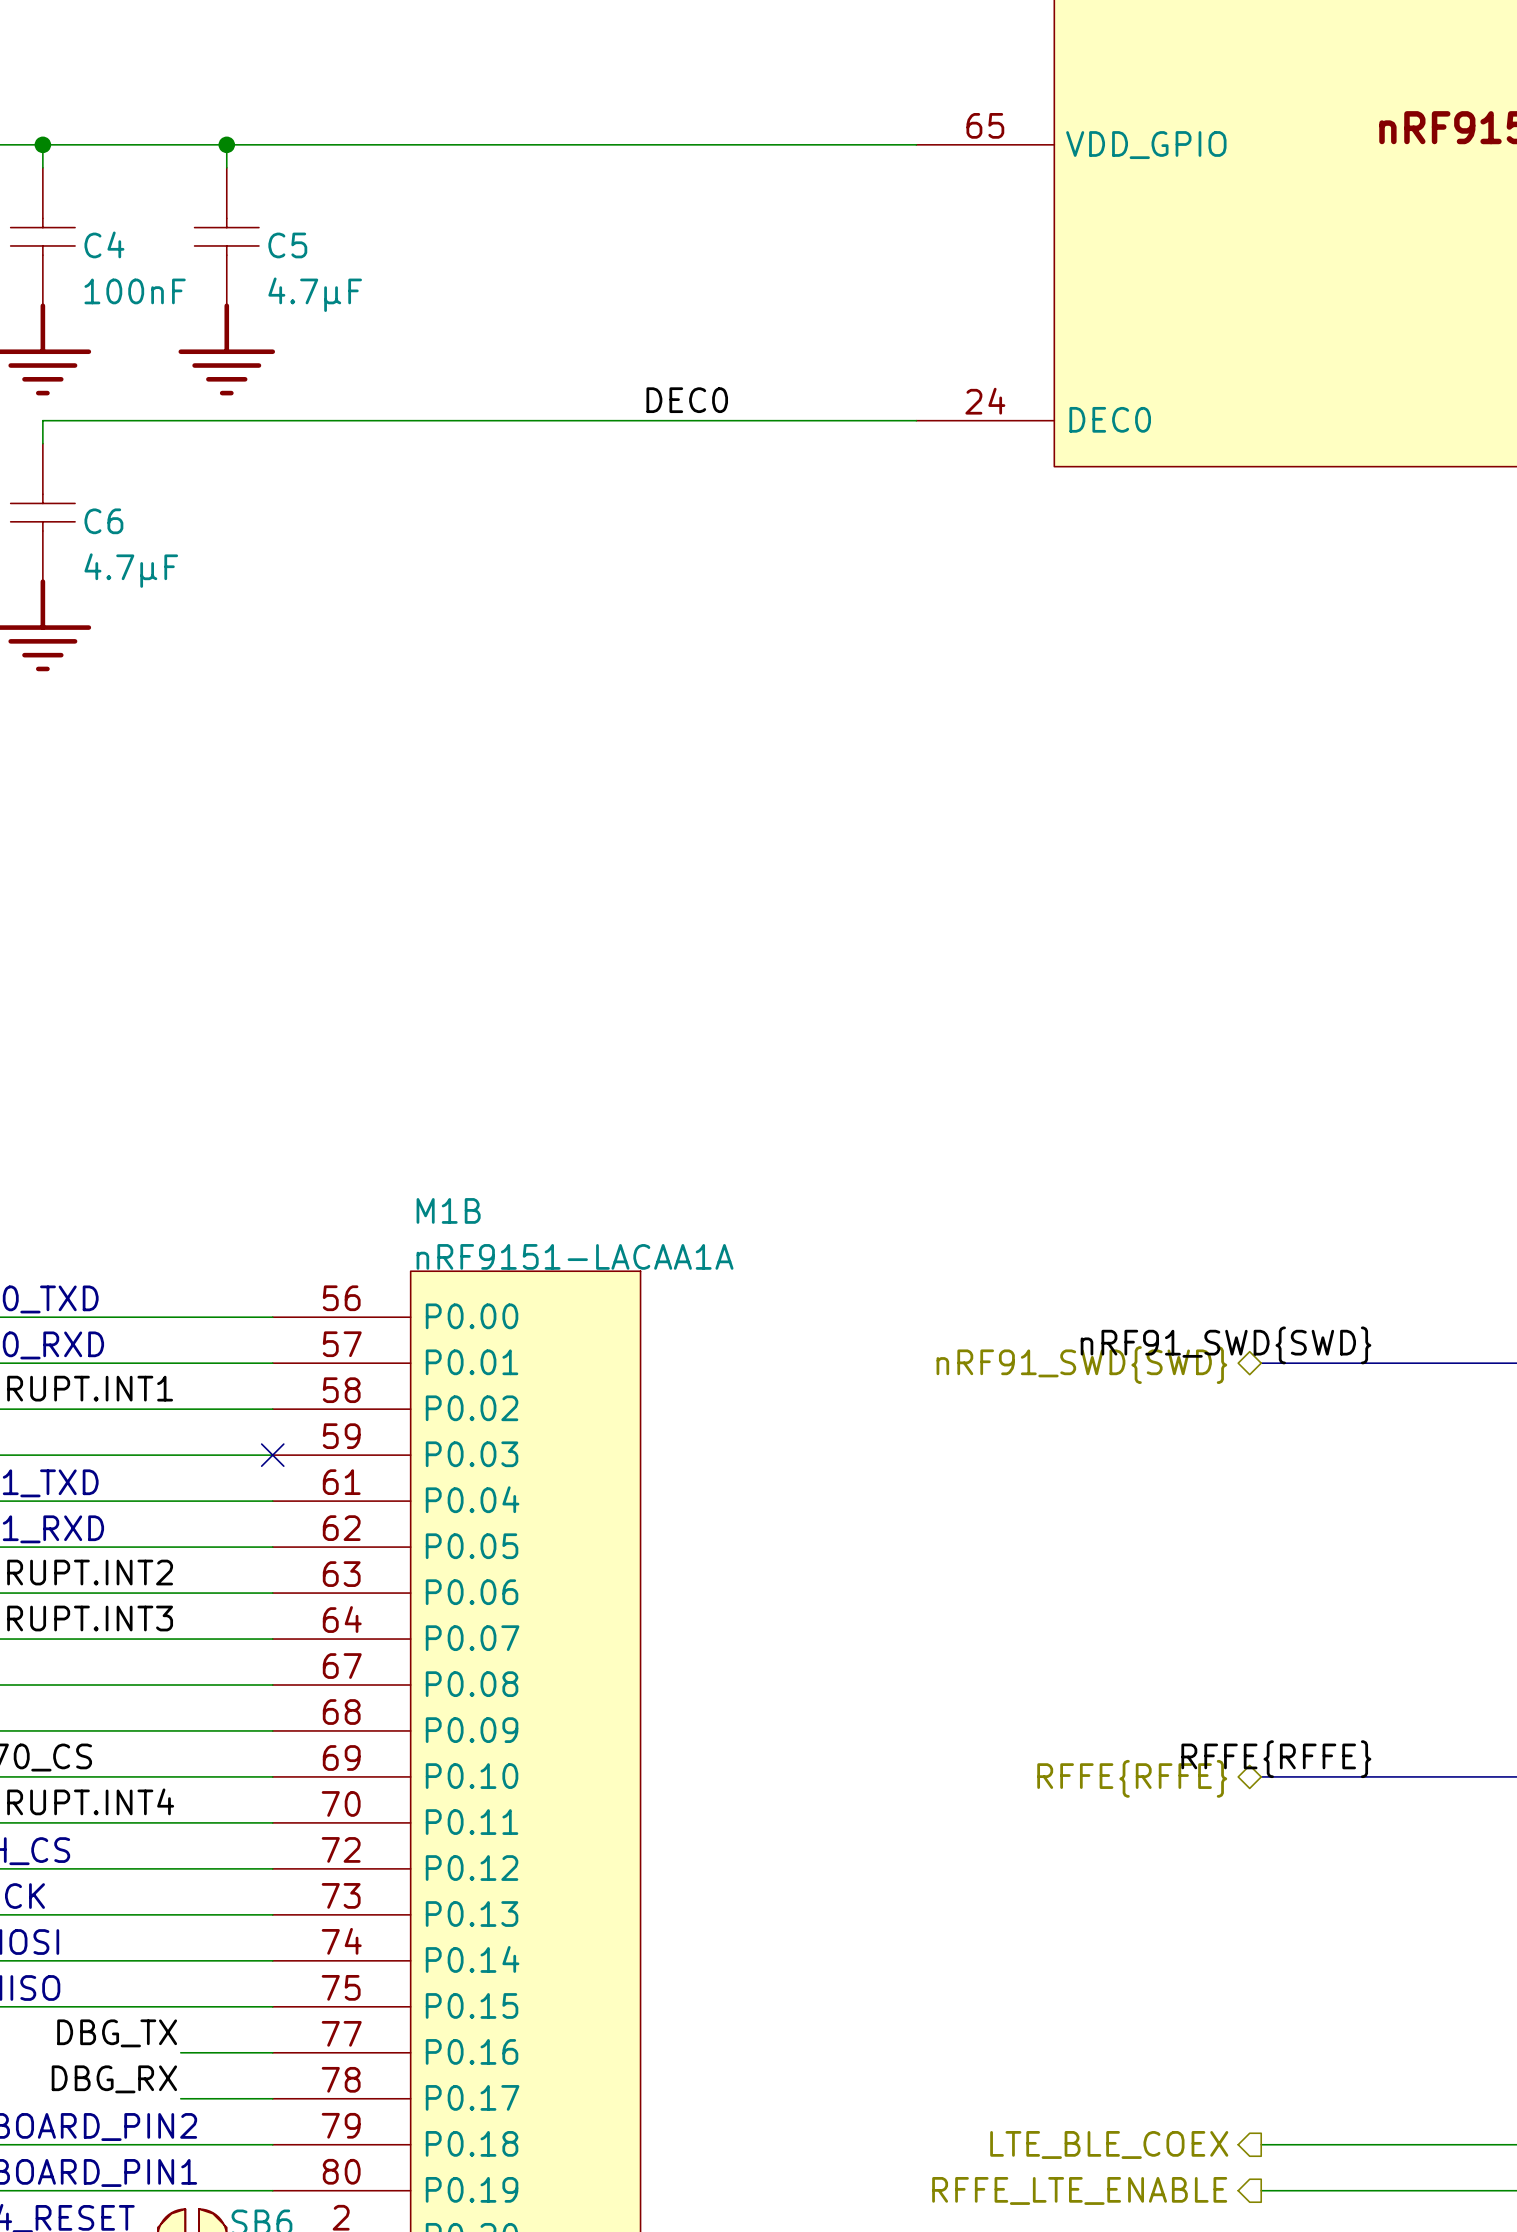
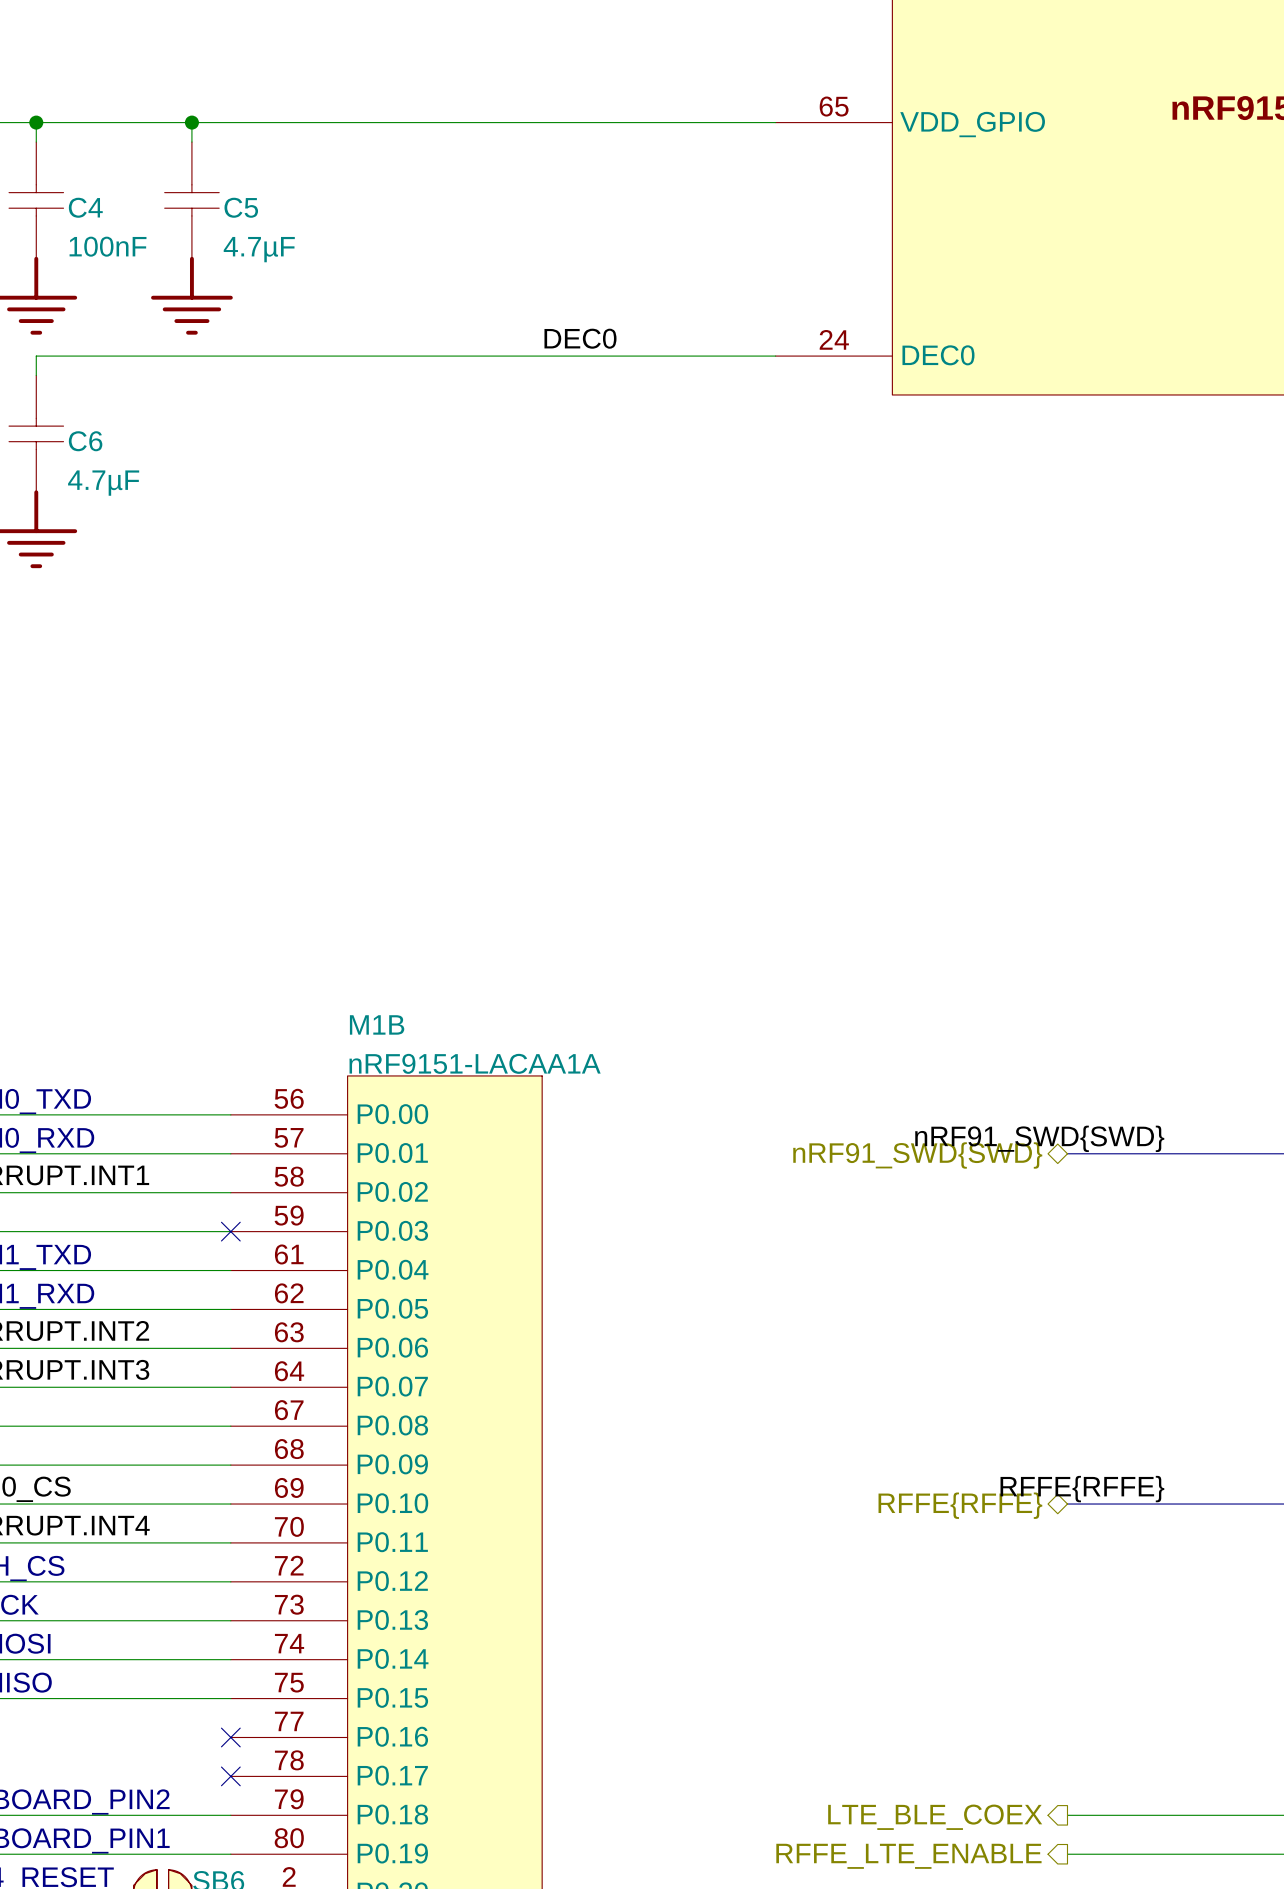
label: DBG_TX (117, 2033) -> none
wire: (180, 2052) (272, 2052) -> none
no-connect mark: none -> (230, 1737)
label: DBG_RX (114, 2079) -> none
wire: (180, 2098) (272, 2098) -> none
no-connect mark: none -> (230, 1776)

